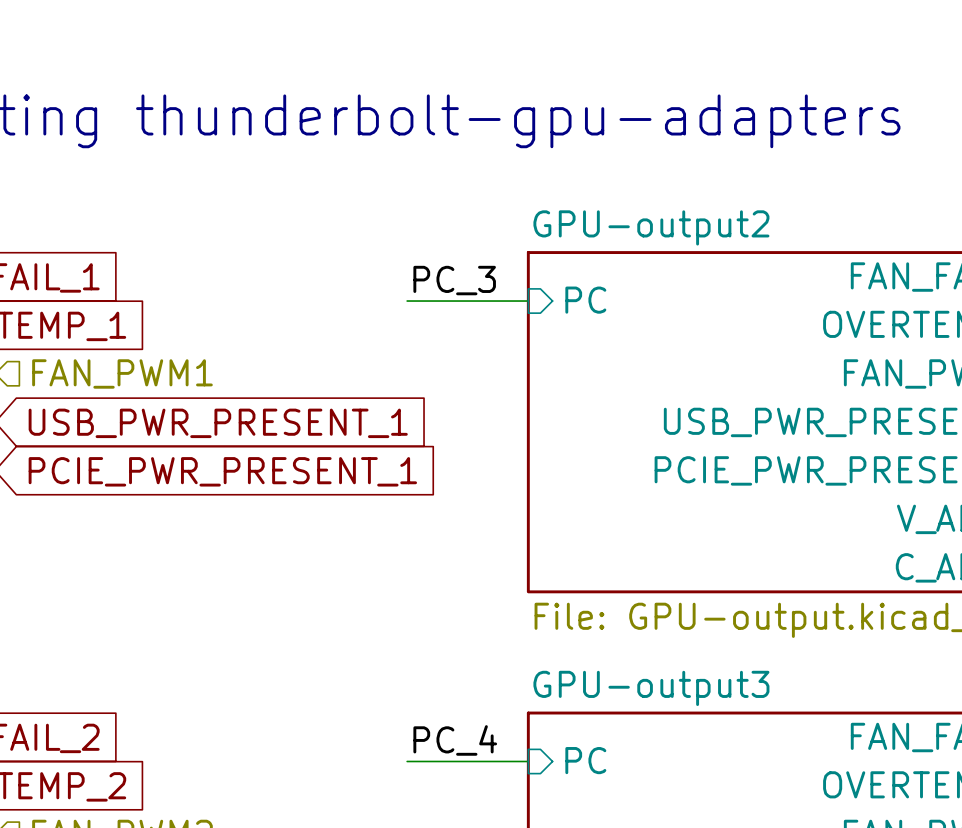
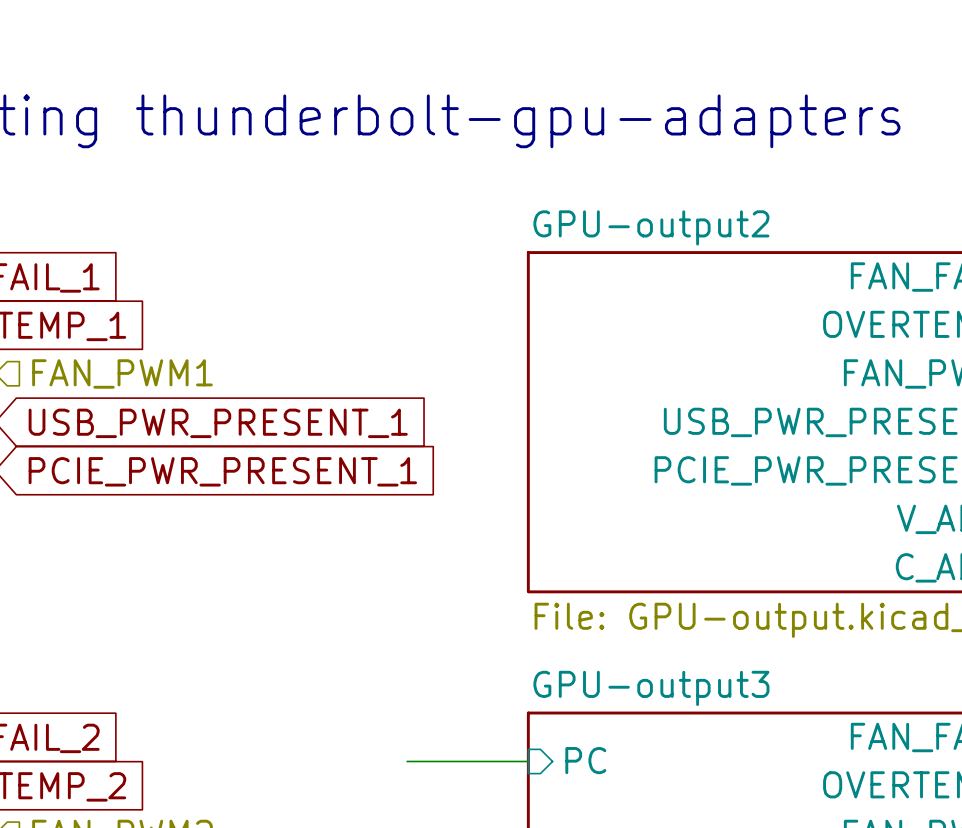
label: PC_3 (454, 280) -> none
sheet pin: PC (585, 300) -> none
wire: (407, 301) (528, 301) -> none
label: PC_4 (455, 740) -> none

